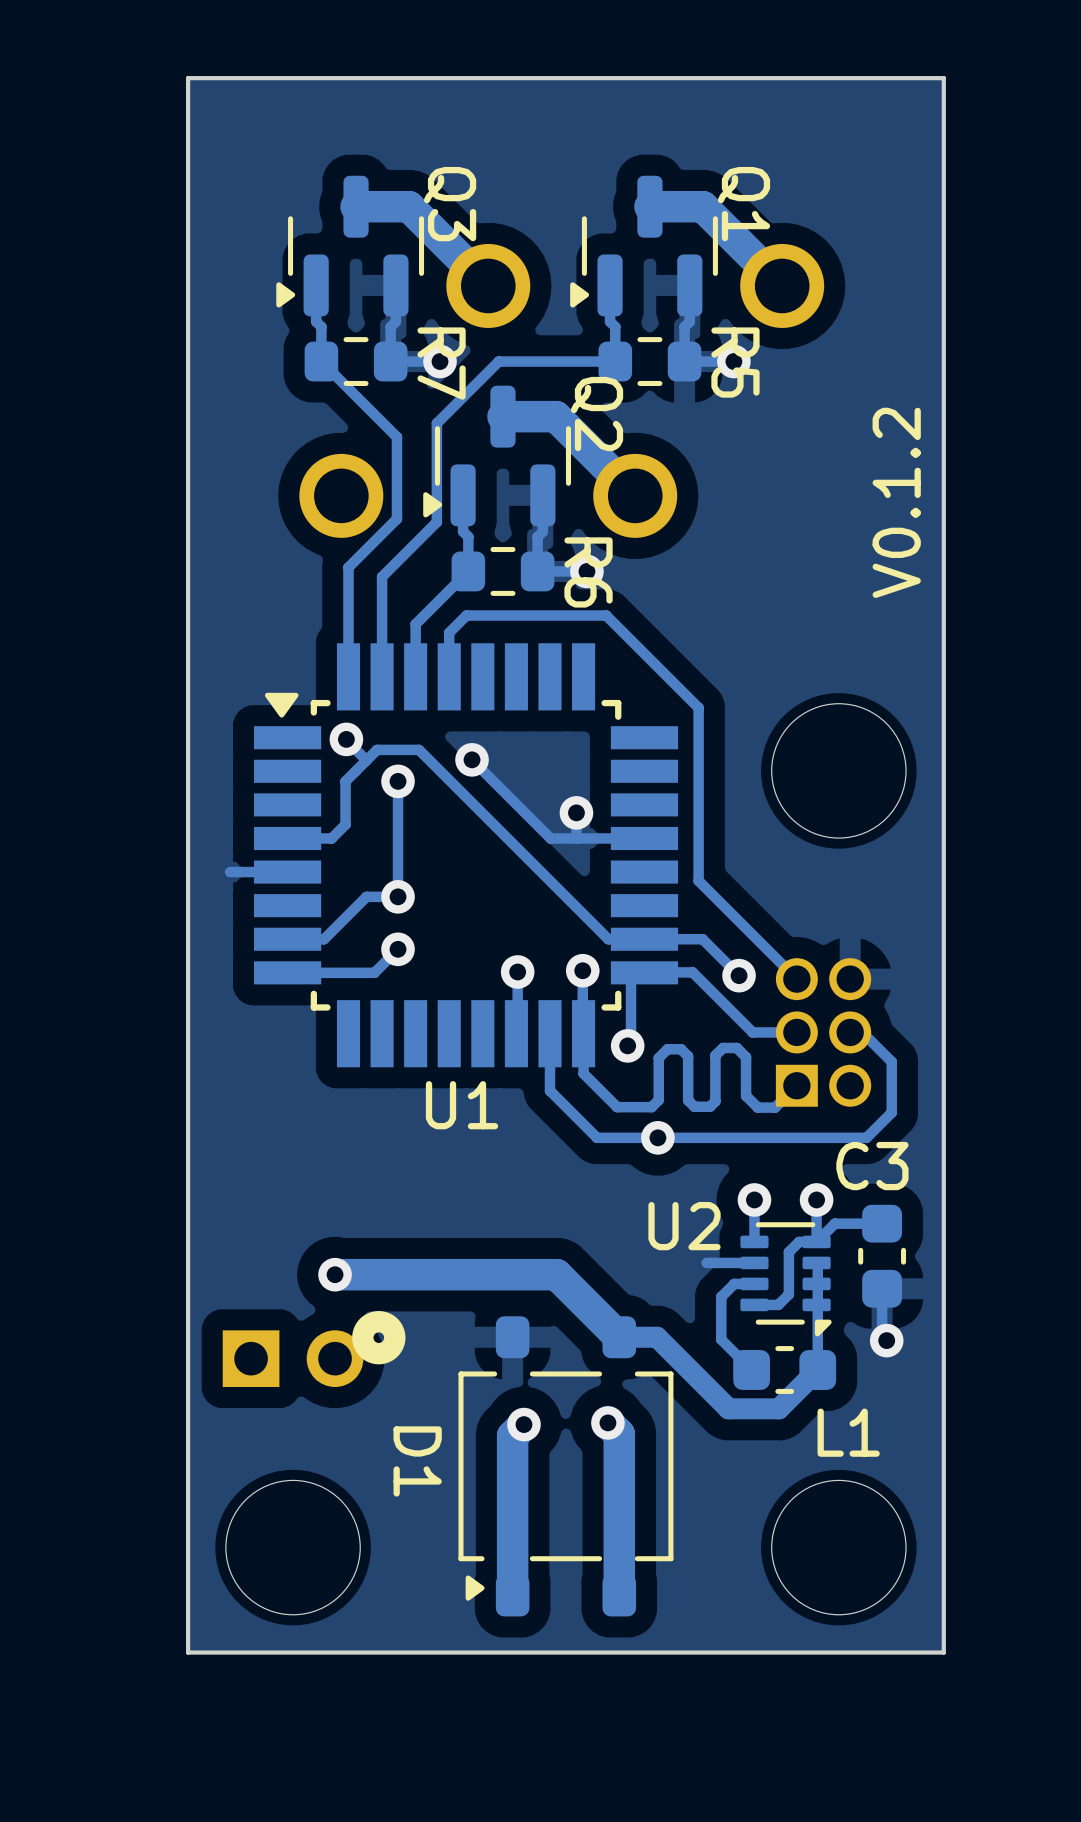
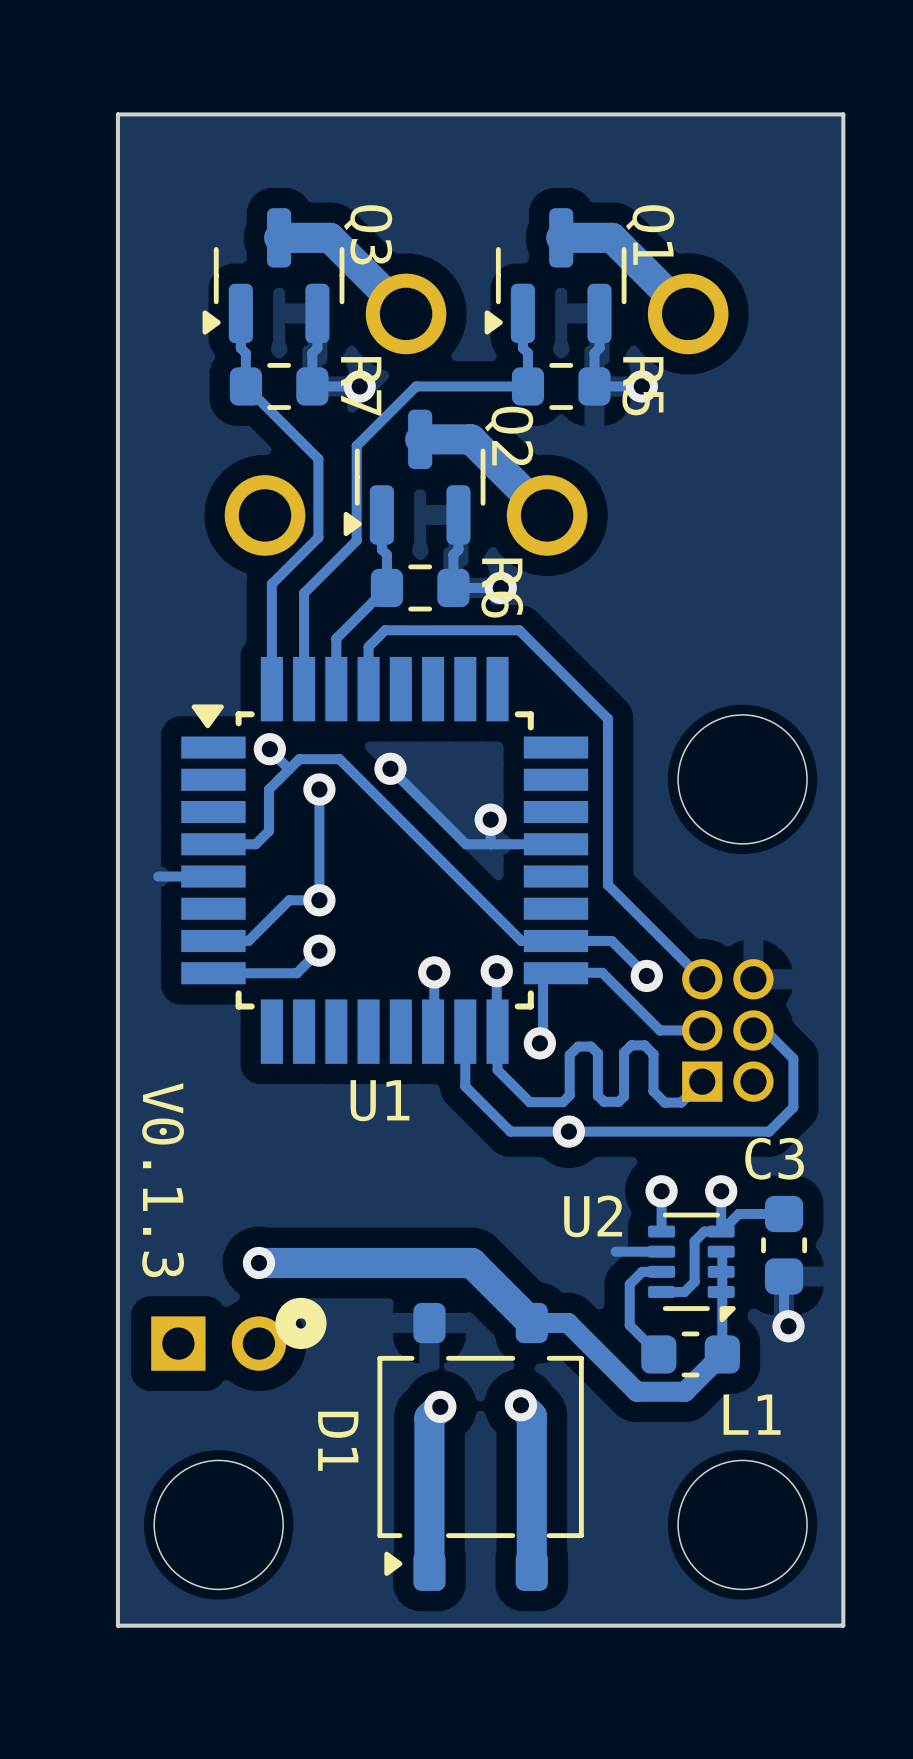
text: V0.1.2 (896, 502) -> none
text: none -> V0.1.3 (163, 1180)

